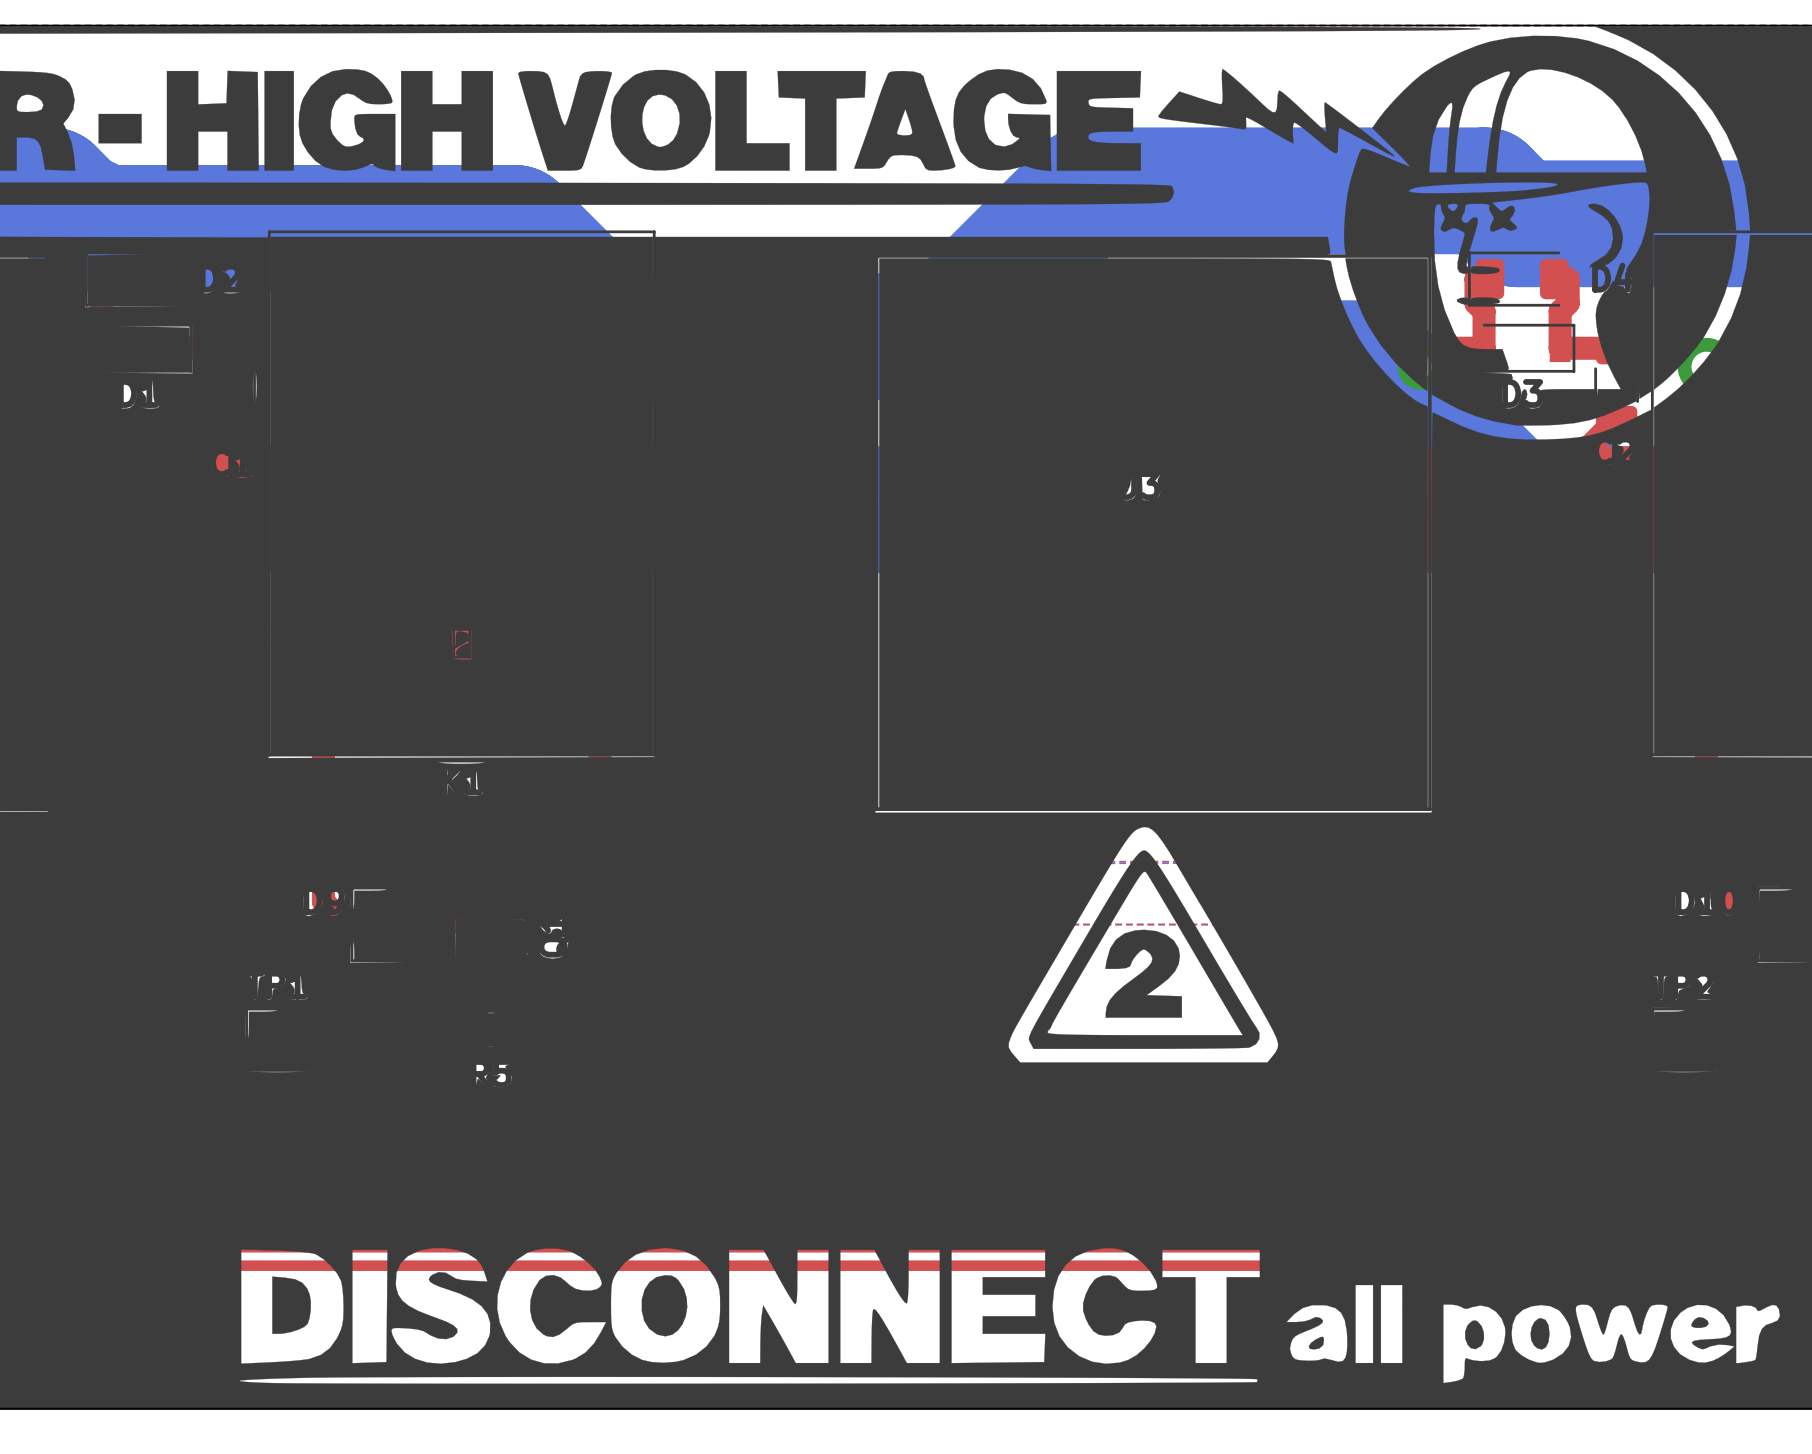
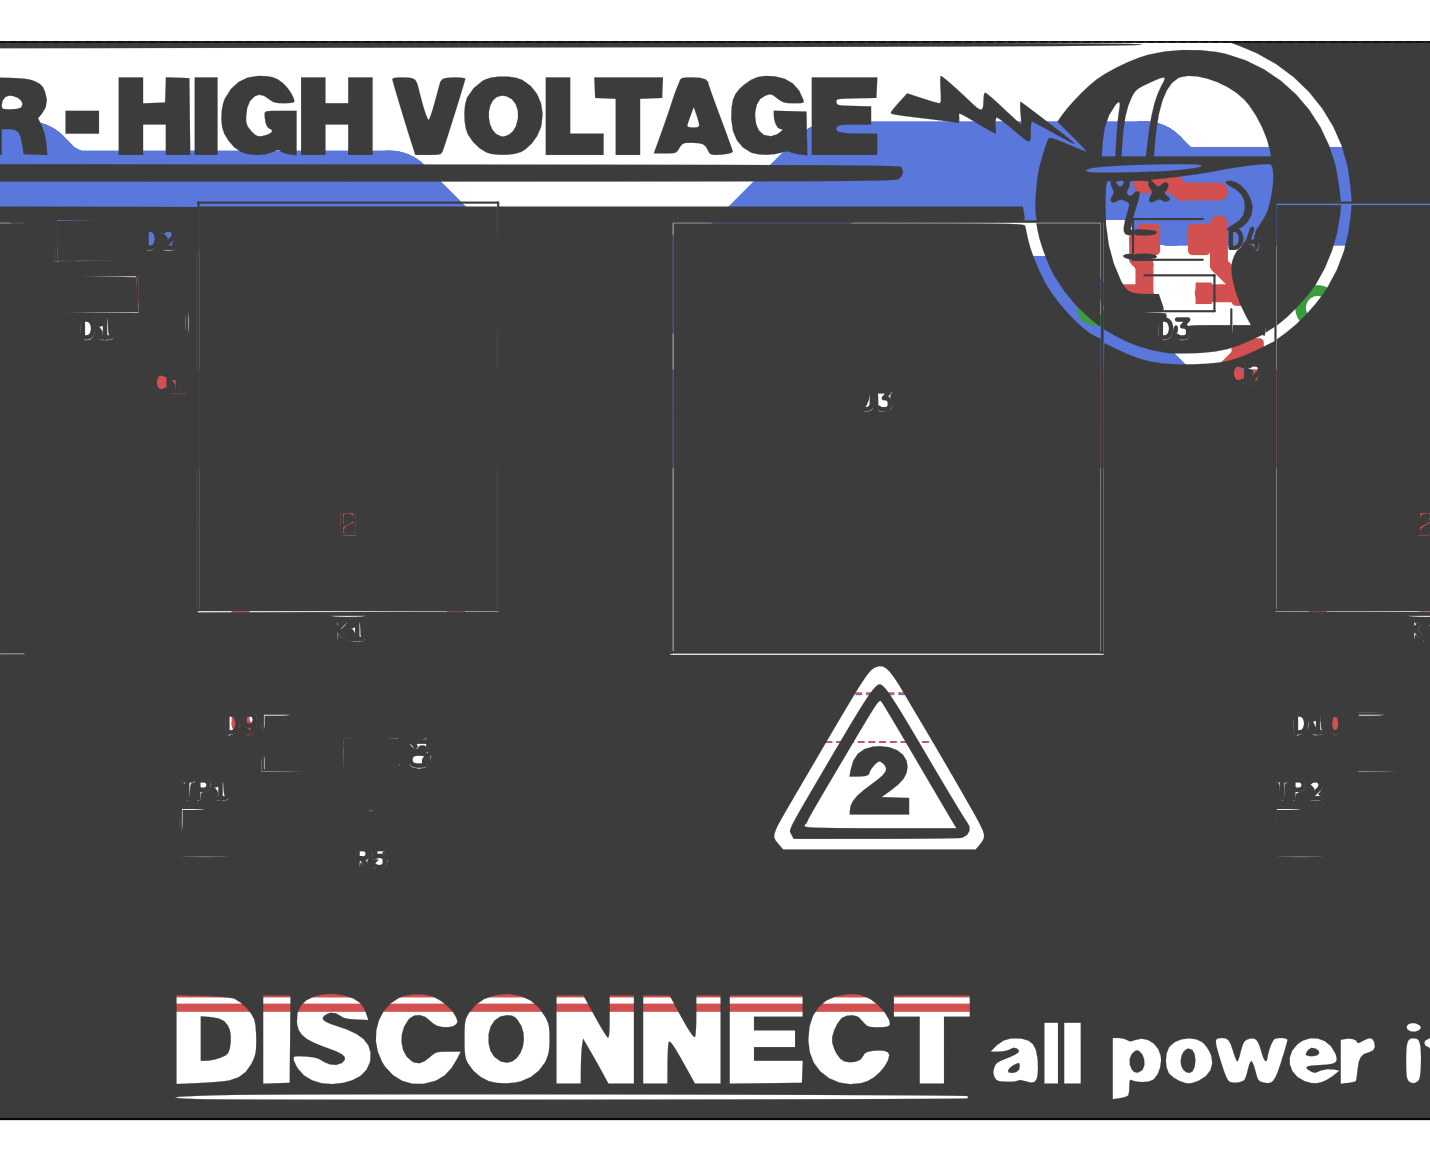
top track: none -> (1142, 184) (1174, 184) (1181, 191) (1218, 191)
top track: none -> (1218, 224) (1218, 264) (1247, 293)
top track: (1561, 279) (1568, 279) (1568, 303) (1560, 311) (1560, 348) -> none

